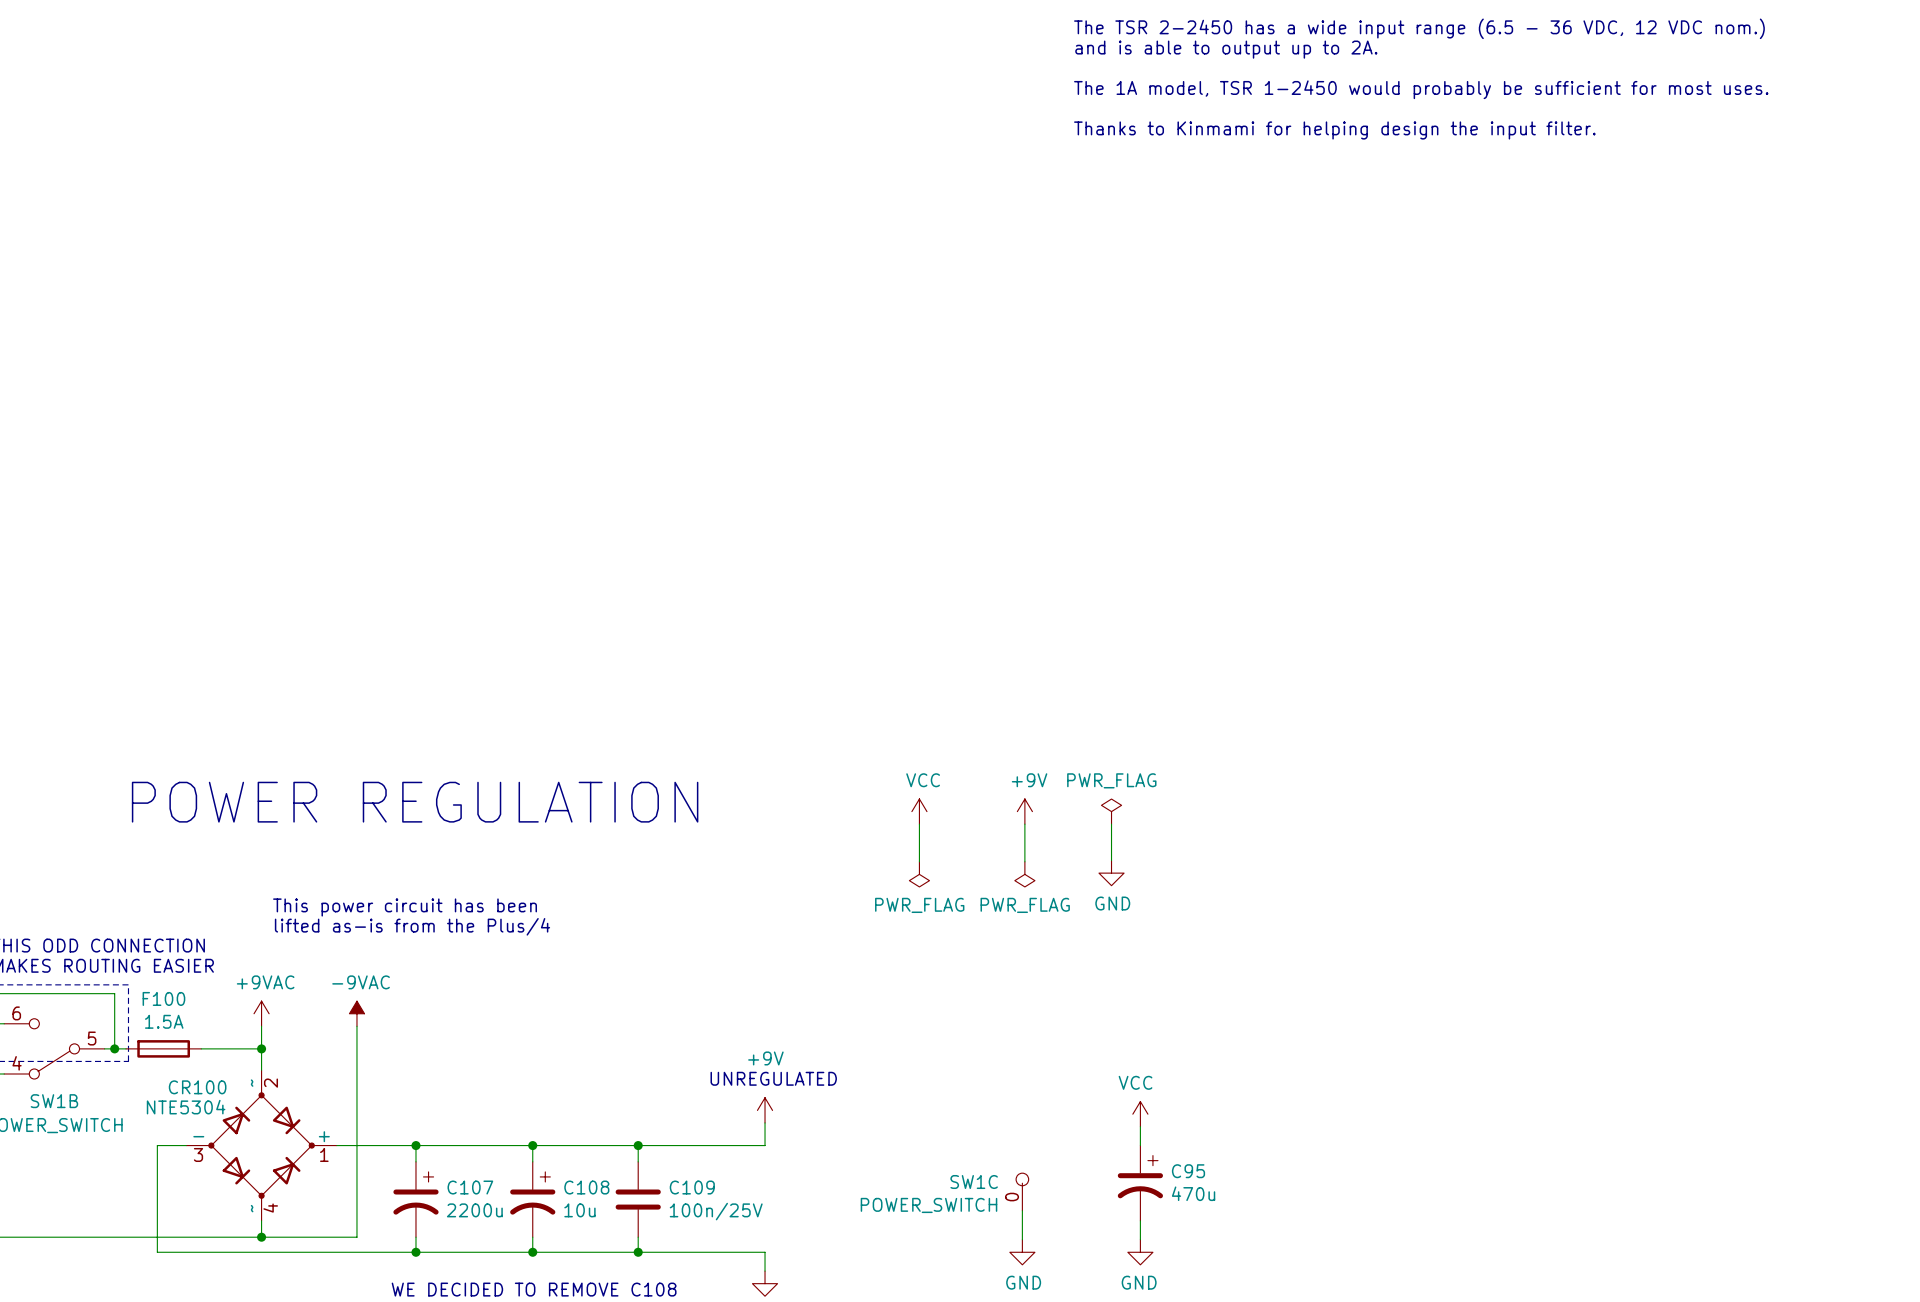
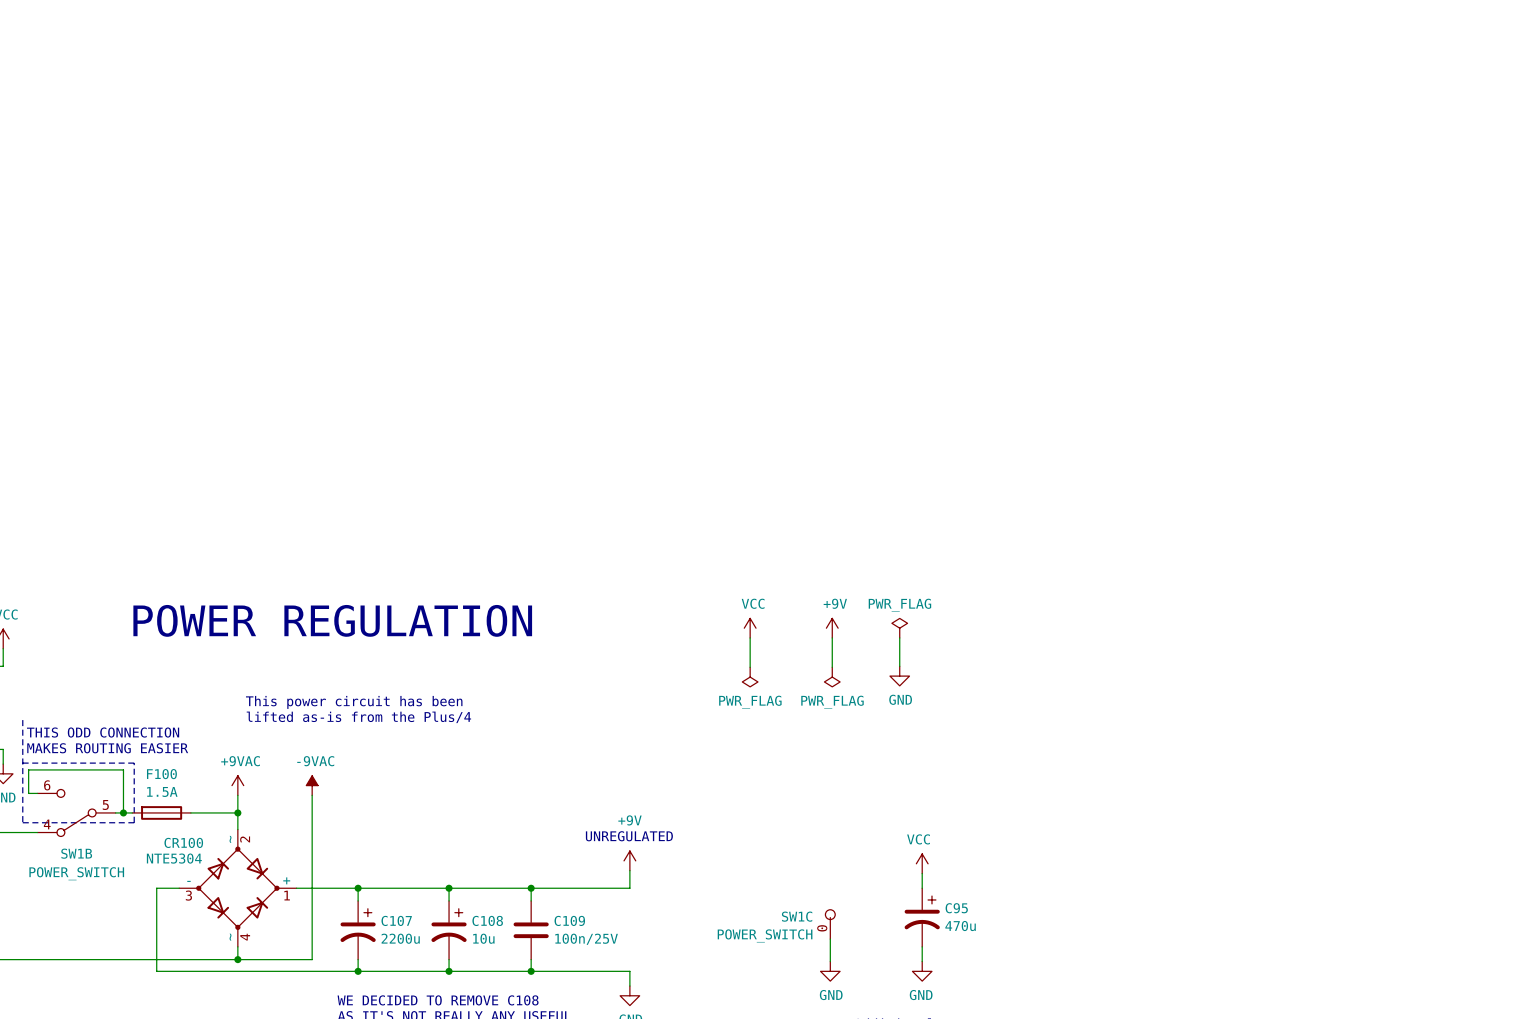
text: The TSR 2-2450 has a wide input range (6.5 - 36 VDC, 12 VDC nom.) (1419, 28) -> none
text: and is able to output up to 2A. (1226, 49) -> none
text: The 1A model, TSR 1-2450 would probably be sufficient for most uses. (1421, 89) -> none
text: Thanks to Kinmami for helping design the input filter. (1334, 130) -> none

